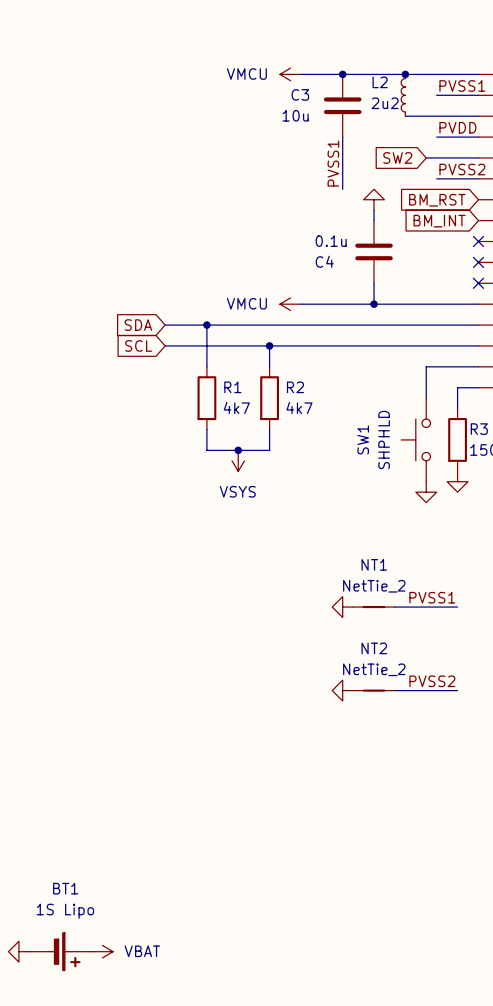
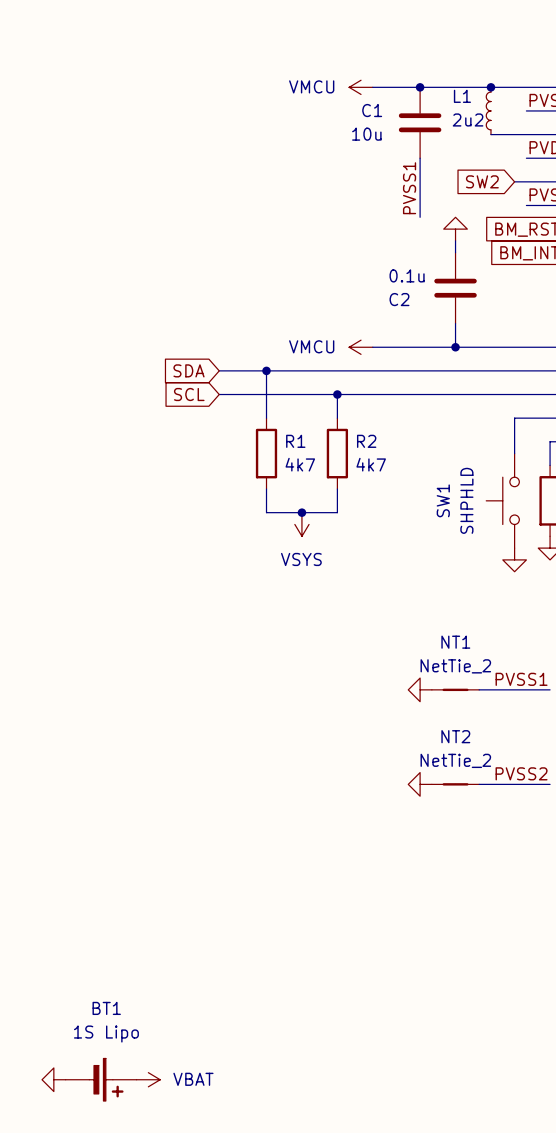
L2 name: L2 (380, 82) -> L1 (462, 96)
C3 name: C3 (300, 94) -> C1 (372, 110)
C4 name: C4 (324, 261) -> C2 (399, 299)

